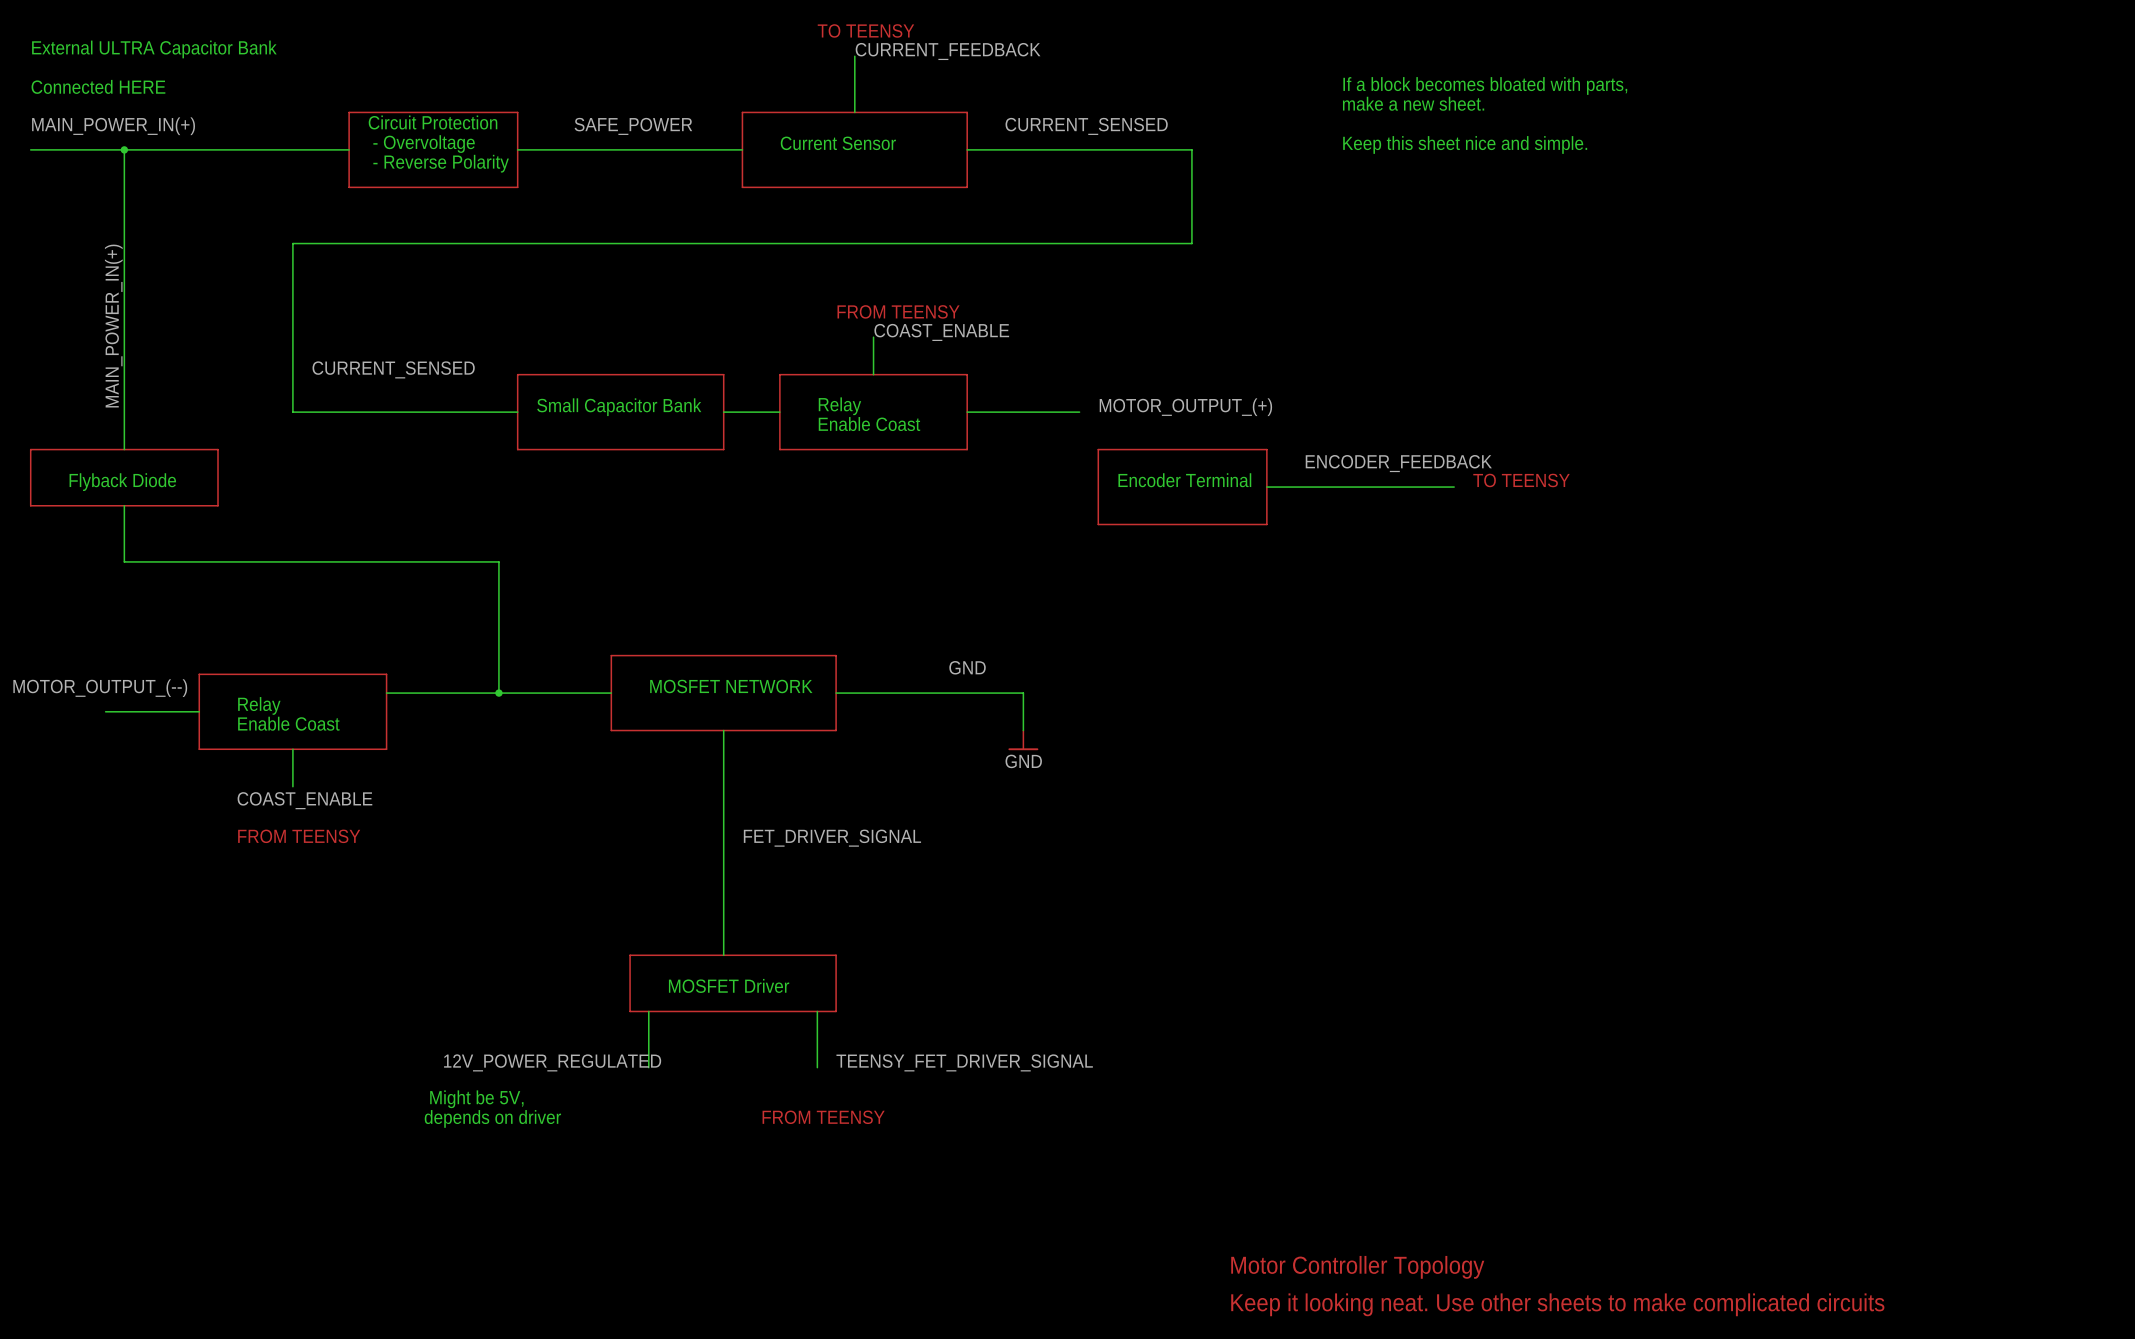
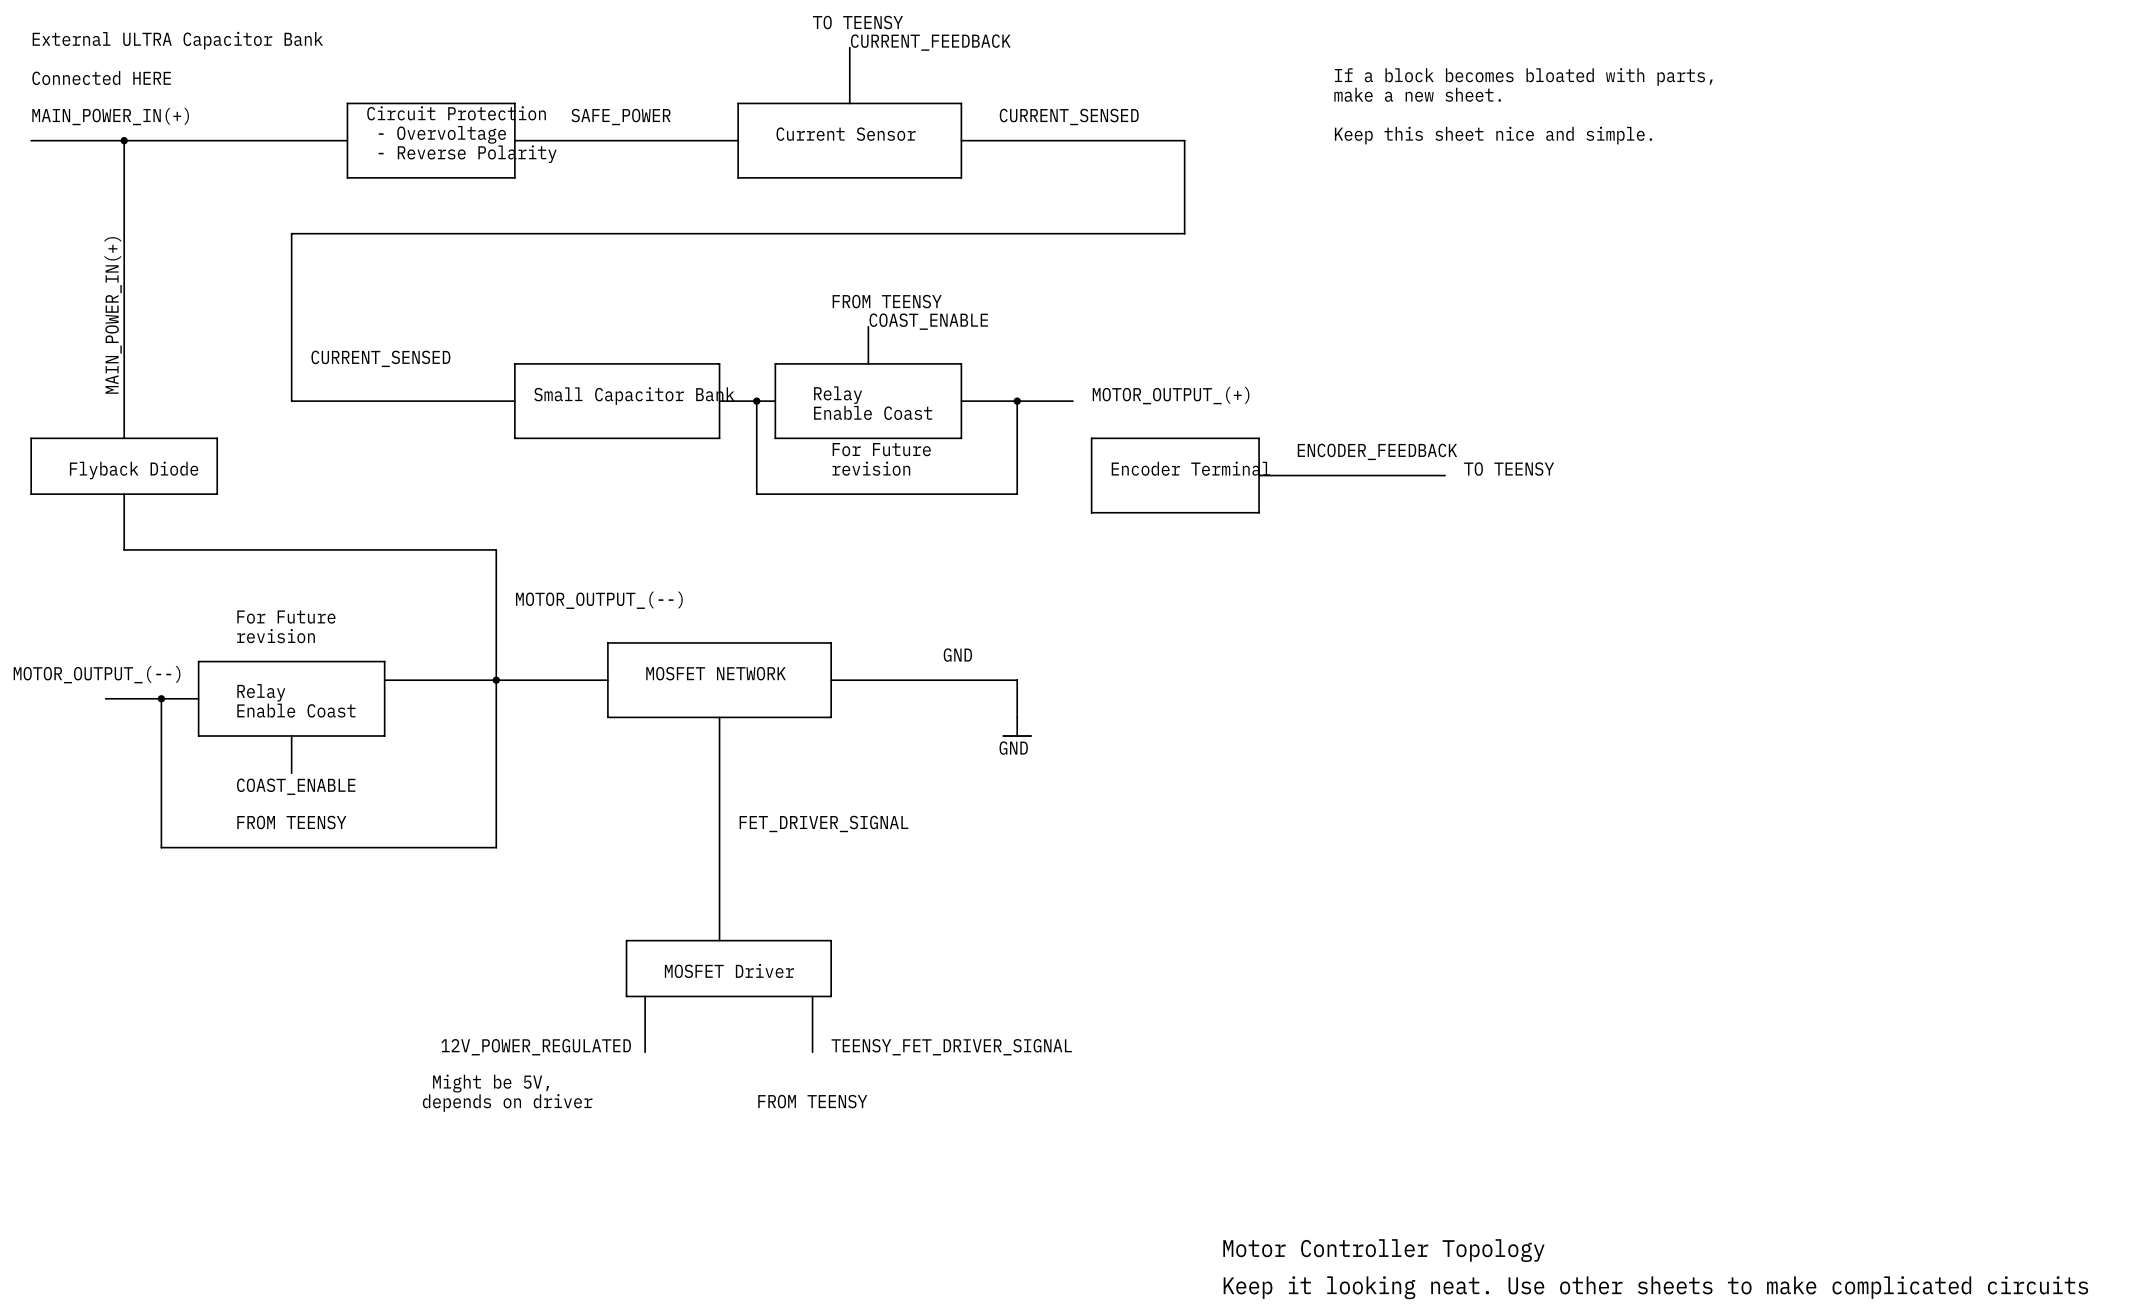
wire: none -> (756, 401) (756, 494) (1017, 494) (1017, 401)
junction: none -> (756, 401)
junction: none -> (1017, 401)
text: none -> For Future (881, 449)
text: none -> revision (871, 468)
label: none -> MOTOR_OUTPUT_(--) (599, 600)
text: none -> For Future (286, 617)
text: none -> revision (276, 636)
wire: none -> (496, 680) (496, 847) (161, 847) (161, 698)
junction: none -> (161, 698)

